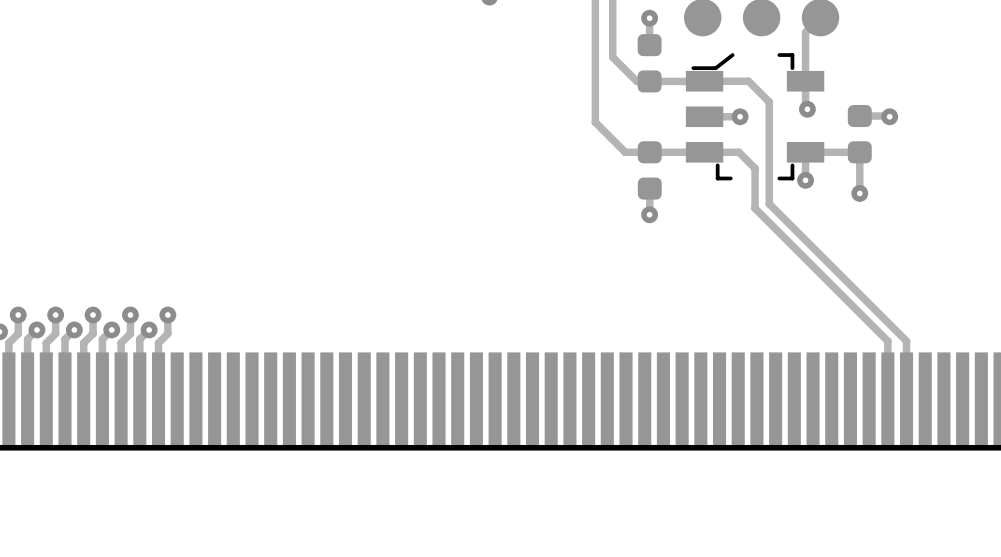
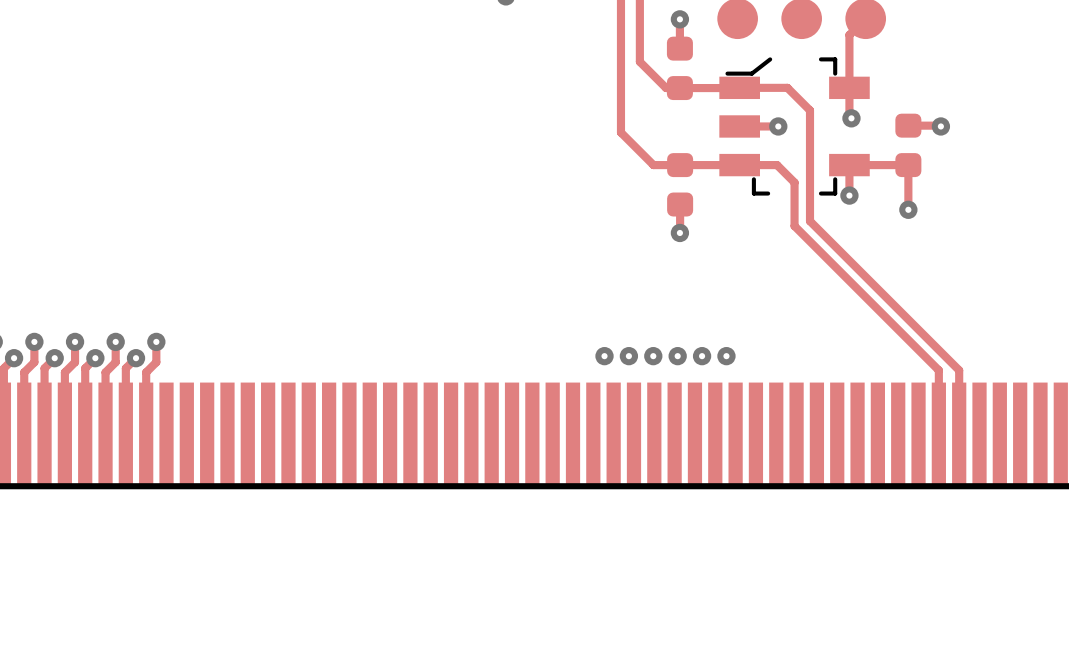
via: none -> (604, 356)
via: none -> (628, 356)
via: none -> (653, 356)
via: none -> (677, 356)
via: none -> (702, 356)
via: none -> (726, 356)

